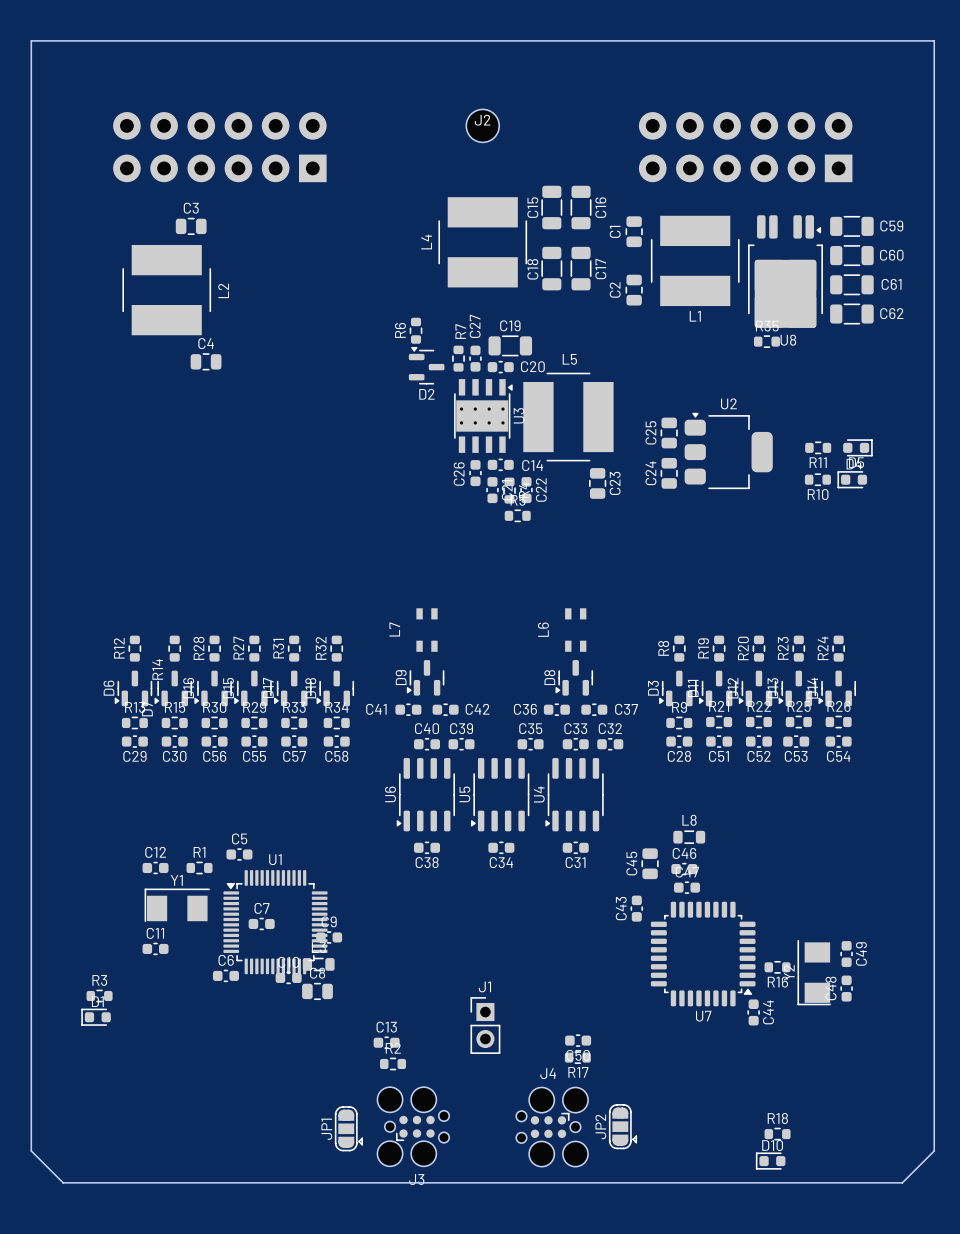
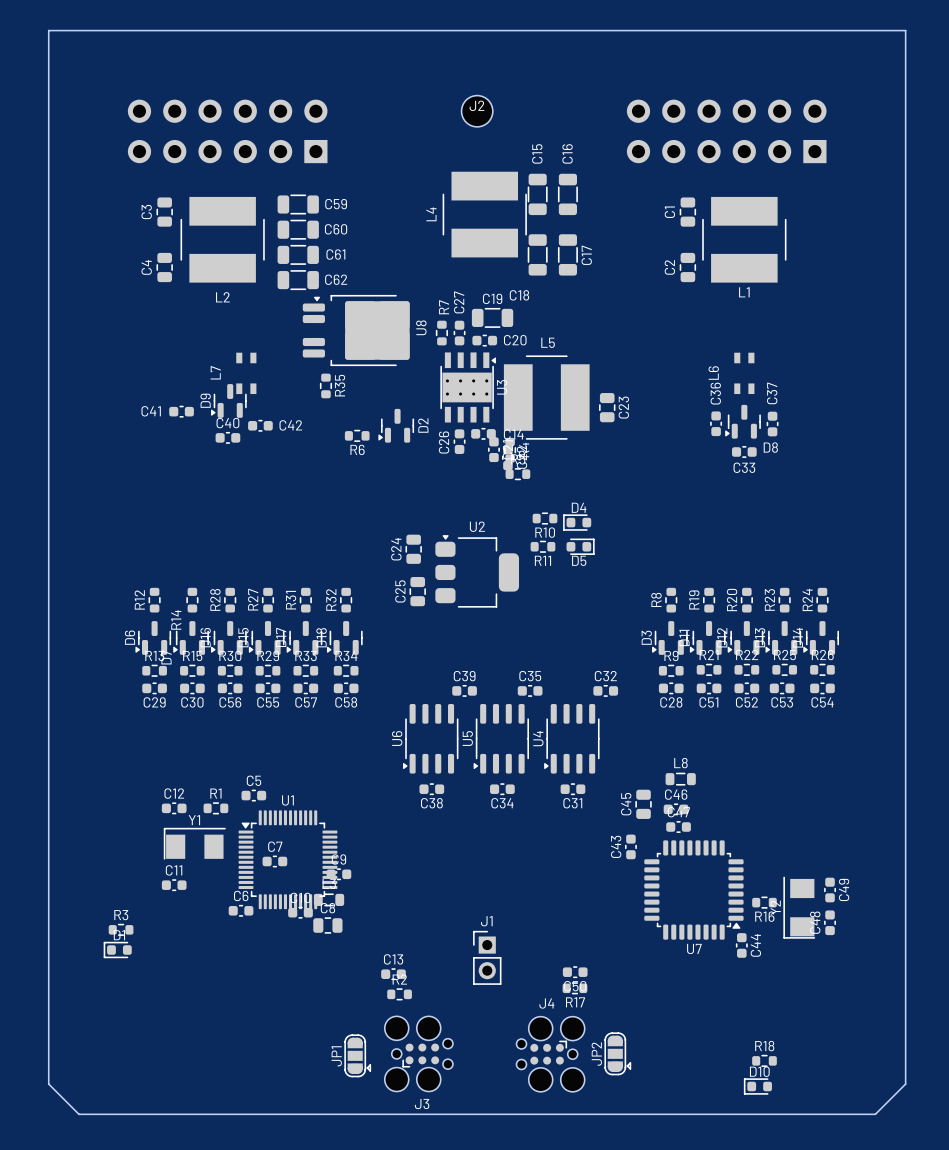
J2 footprint: [30, 40, 935, 1184] -> [48, 30, 907, 1115]
C15 name position: C15 (532, 207) -> C15 (537, 153)
C15 position: (551, 207) -> (537, 194)
C16 position: (581, 207) -> (567, 194)
C16 name position: C16 (600, 207) -> C16 (567, 153)
C3 name position: C3 (191, 208) -> C3 (146, 212)
C3 rotation: 0° (191, 226) -> 90° clockwise (164, 212)
C3 position: (191, 226) -> (164, 212)
C59 position: (851, 226) -> (298, 204)
C1 position: (634, 231) -> (687, 212)
C60 position: (851, 255) -> (298, 229)
L1 position: (695, 260) -> (744, 239)
C18 position: (551, 268) -> (537, 254)
C17 position: (581, 268) -> (567, 254)
C18 name rotation: 0° (532, 269) -> 90° clockwise (519, 295)
C18 name position: C18 (532, 269) -> C18 (519, 295)
U8 rotation: 0° (785, 271) -> 90° counterclockwise (356, 330)
U8 position: (785, 271) -> (356, 330)
C61 position: (851, 284) -> (298, 254)
L2 position: (166, 290) -> (222, 239)
L2 name rotation: 0° (223, 290) -> 90° clockwise (222, 297)
L2 name position: L2 (223, 290) -> L2 (222, 297)
C2 position: (634, 290) -> (687, 267)
C62 position: (851, 314) -> (298, 280)
R6 name position: R6 (400, 330) -> R6 (357, 449)
R6 rotation: 0° (416, 330) -> 90° clockwise (357, 435)
R6 position: (416, 330) -> (357, 435)
R35 rotation: 0° (766, 341) -> 90° clockwise (325, 385)
R35 position: (766, 341) -> (325, 385)
C4 name position: C4 (206, 343) -> C4 (146, 267)
C19 position: (510, 345) -> (492, 317)
R7 position: (458, 358) -> (441, 333)
C27 position: (475, 358) -> (459, 333)
C4 rotation: 0° (206, 361) -> 90° clockwise (164, 267)
C4 position: (206, 361) -> (164, 267)
D2 rotation: 0° (426, 365) -> 90° counterclockwise (396, 425)
D2 position: (426, 365) -> (396, 425)
C20 position: (500, 367) -> (484, 340)
U3 position: (483, 415) -> (468, 387)
L5 position: (568, 417) -> (546, 397)
C25 position: (669, 432) -> (417, 591)
R11 position: (818, 447) -> (542, 546)
D5 position: (857, 447) -> (580, 546)
U2 position: (728, 450) -> (477, 571)
C14 position: (500, 464) -> (483, 433)
C26 position: (475, 473) -> (459, 441)
C24 position: (669, 473) -> (413, 549)
R10 position: (817, 479) -> (544, 518)
D4 position: (852, 479) -> (577, 522)
C23 position: (597, 483) -> (607, 407)
C22 position: (526, 490) -> (507, 457)
L7 position: (427, 630) -> (246, 373)
L6 position: (575, 630) -> (744, 373)
D9 position: (425, 677) -> (228, 400)
D8 name rotation: 0° (549, 677) -> 90° clockwise (770, 447)
D8 name position: D8 (549, 677) -> D8 (770, 447)
D8 position: (574, 677) -> (742, 421)
C41 position: (408, 709) -> (181, 411)
C42 position: (445, 709) -> (260, 425)
C36 rotation: 0° (556, 709) -> 90° clockwise (716, 423)
C36 position: (556, 709) -> (716, 423)
C37 rotation: 0° (594, 709) -> 90° clockwise (772, 424)
C37 position: (594, 709) -> (772, 424)
C37 name position: C37 (626, 709) -> C37 (772, 393)
C33 name position: C33 (575, 728) -> C33 (744, 467)
C40 position: (427, 744) -> (227, 437)
C33 position: (575, 744) -> (744, 451)

